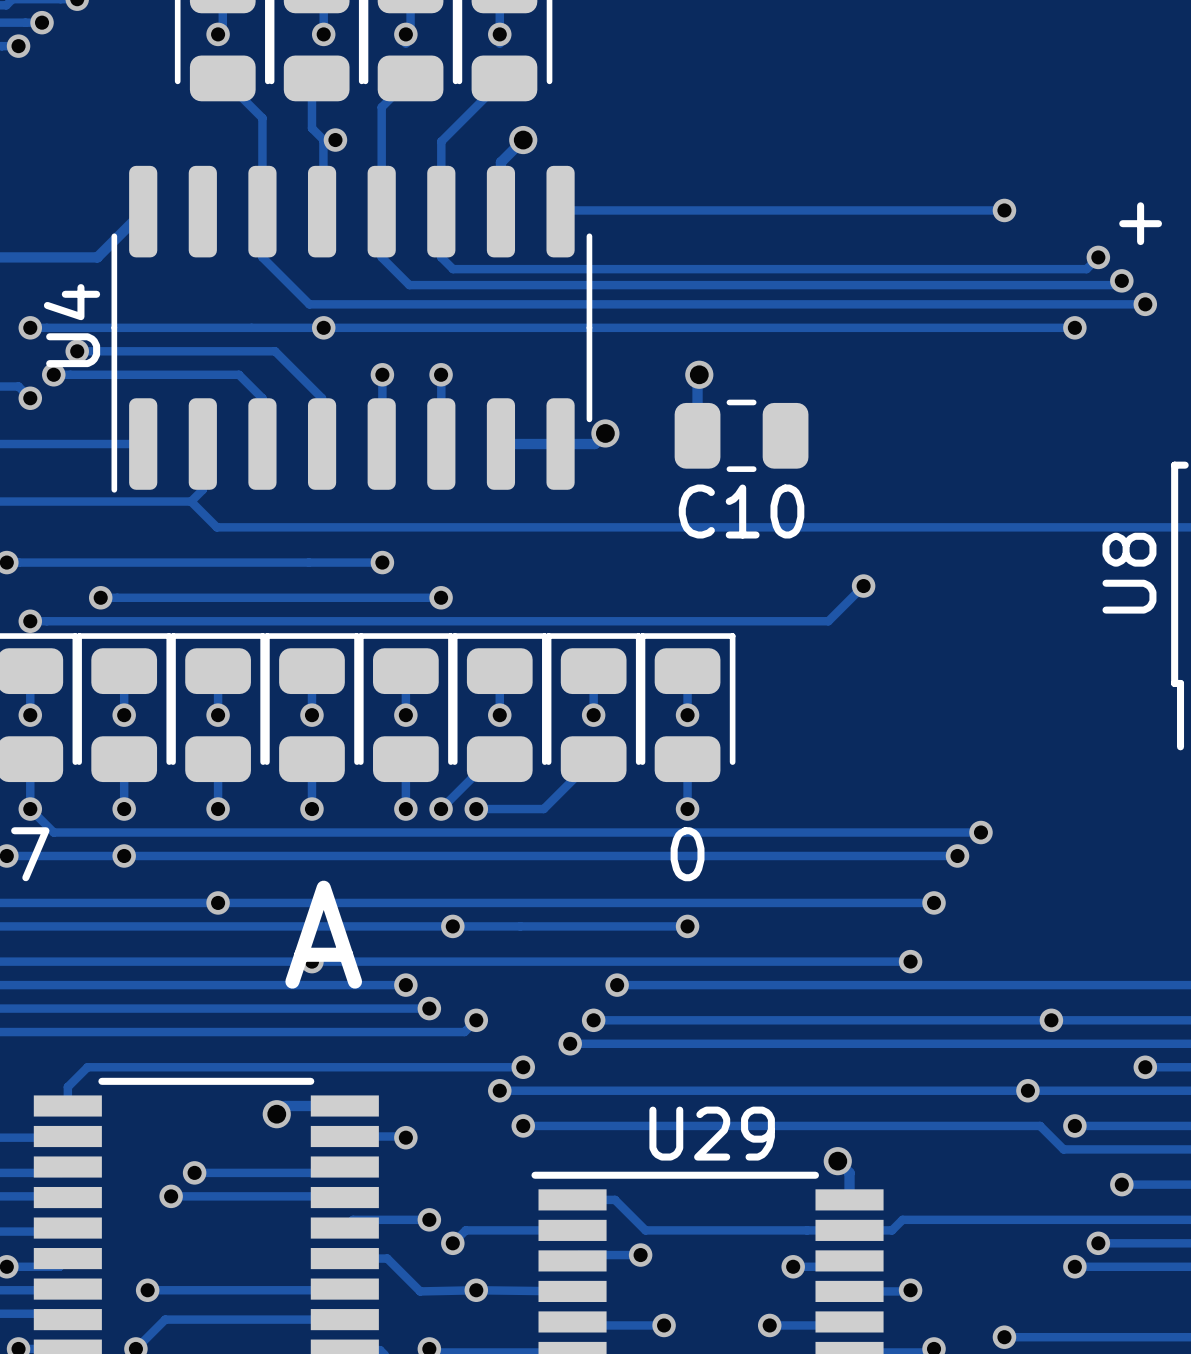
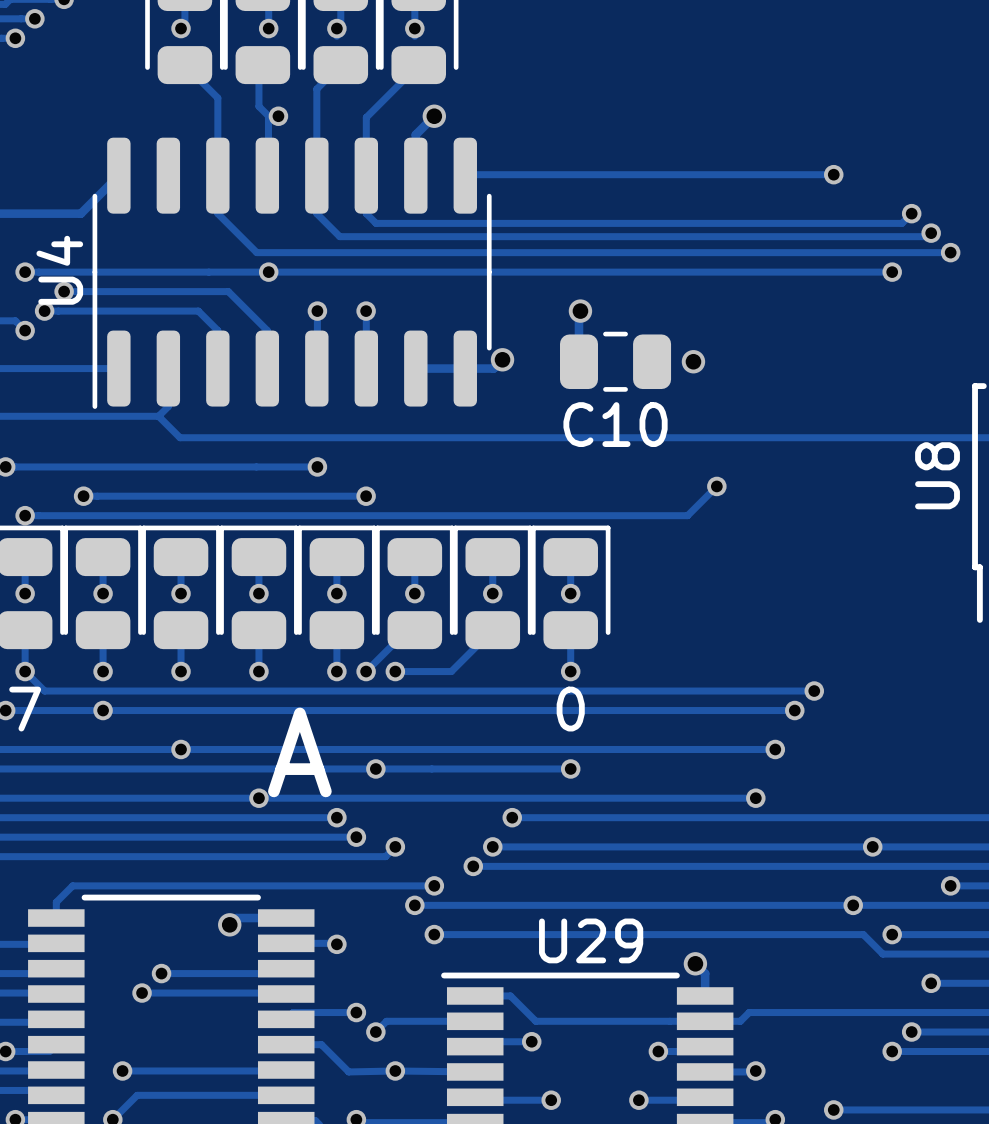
text: + (1140, 223) -> none
via: none -> (693, 361)
text position: A (323, 934) -> A (299, 752)

